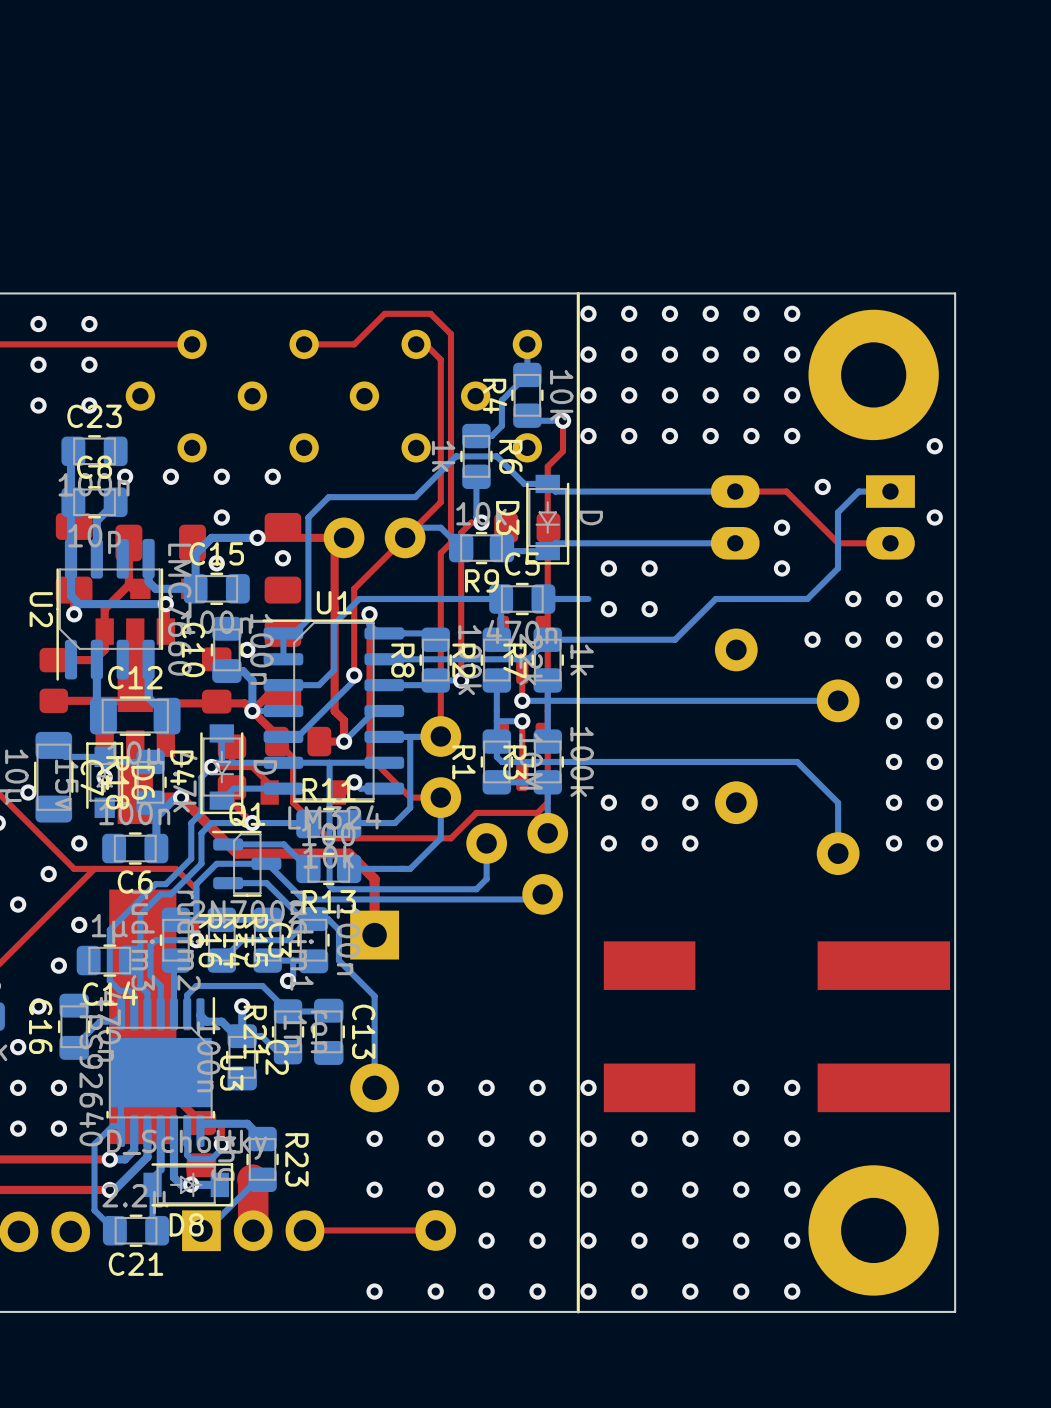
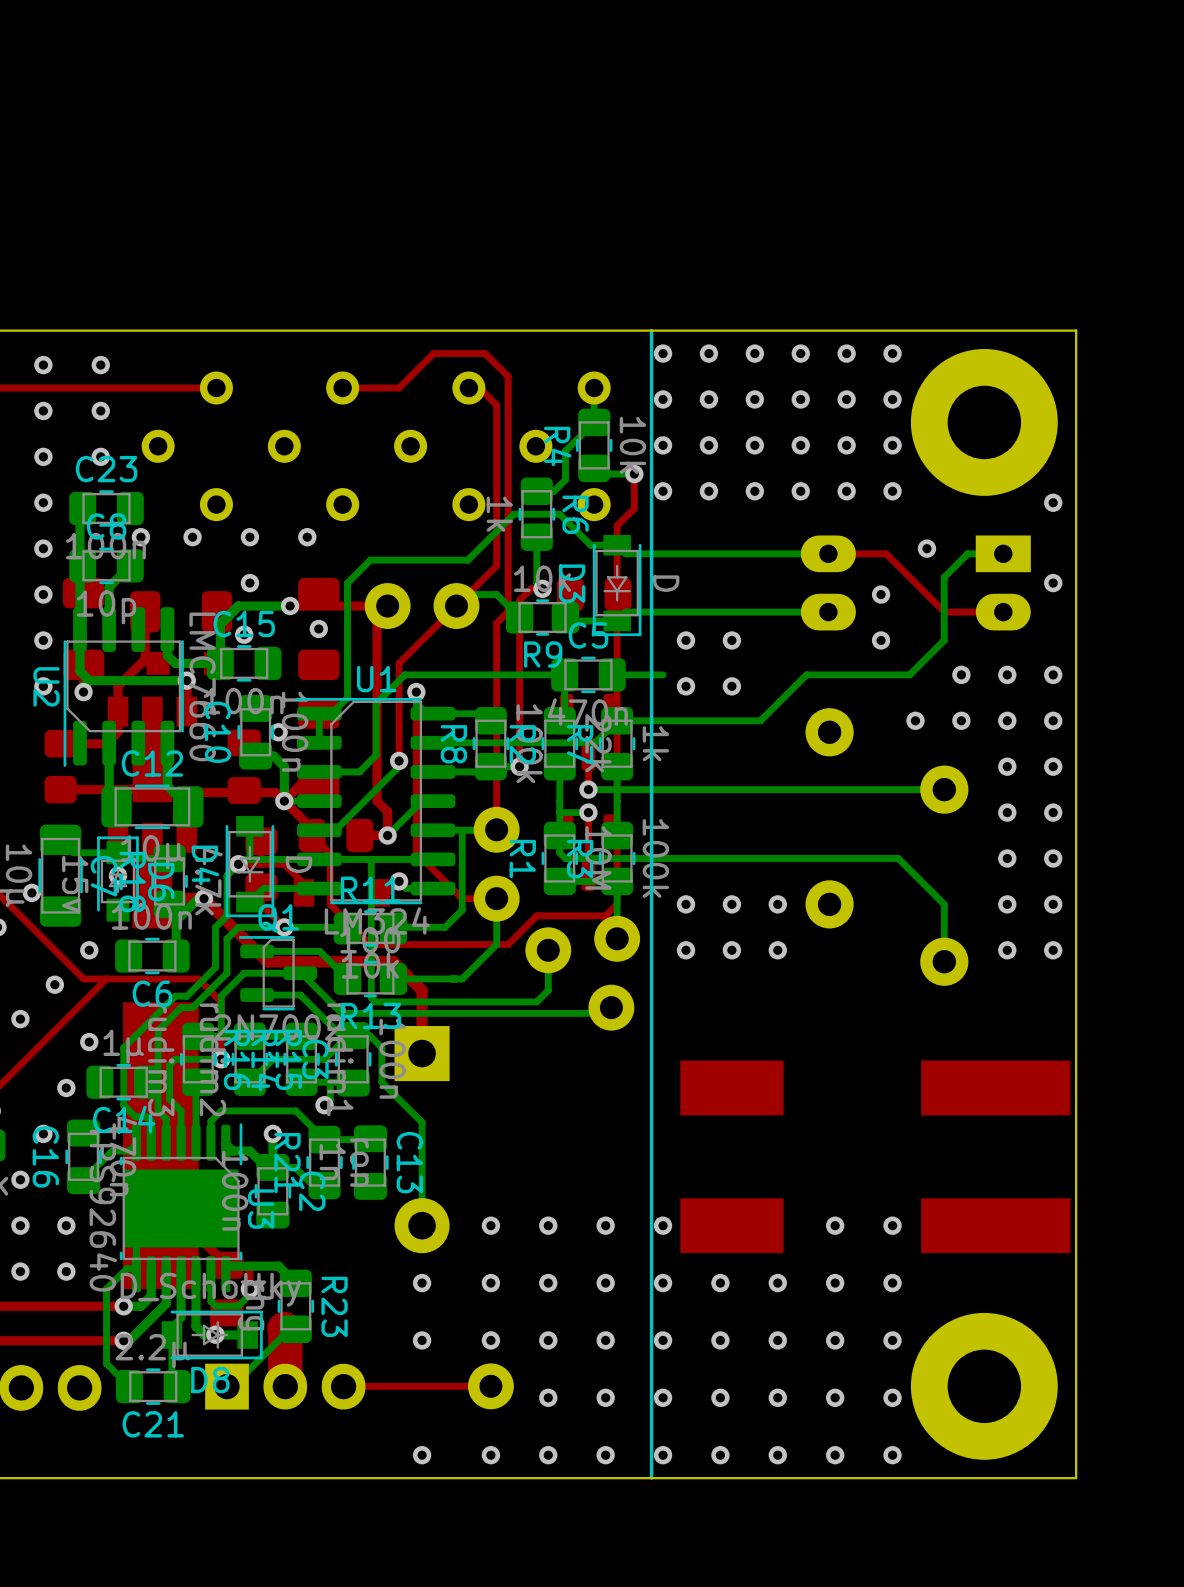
via: none -> (43, 502)
via: none -> (43, 548)
via: none -> (43, 594)
via: none -> (43, 640)
via: none -> (43, 686)

